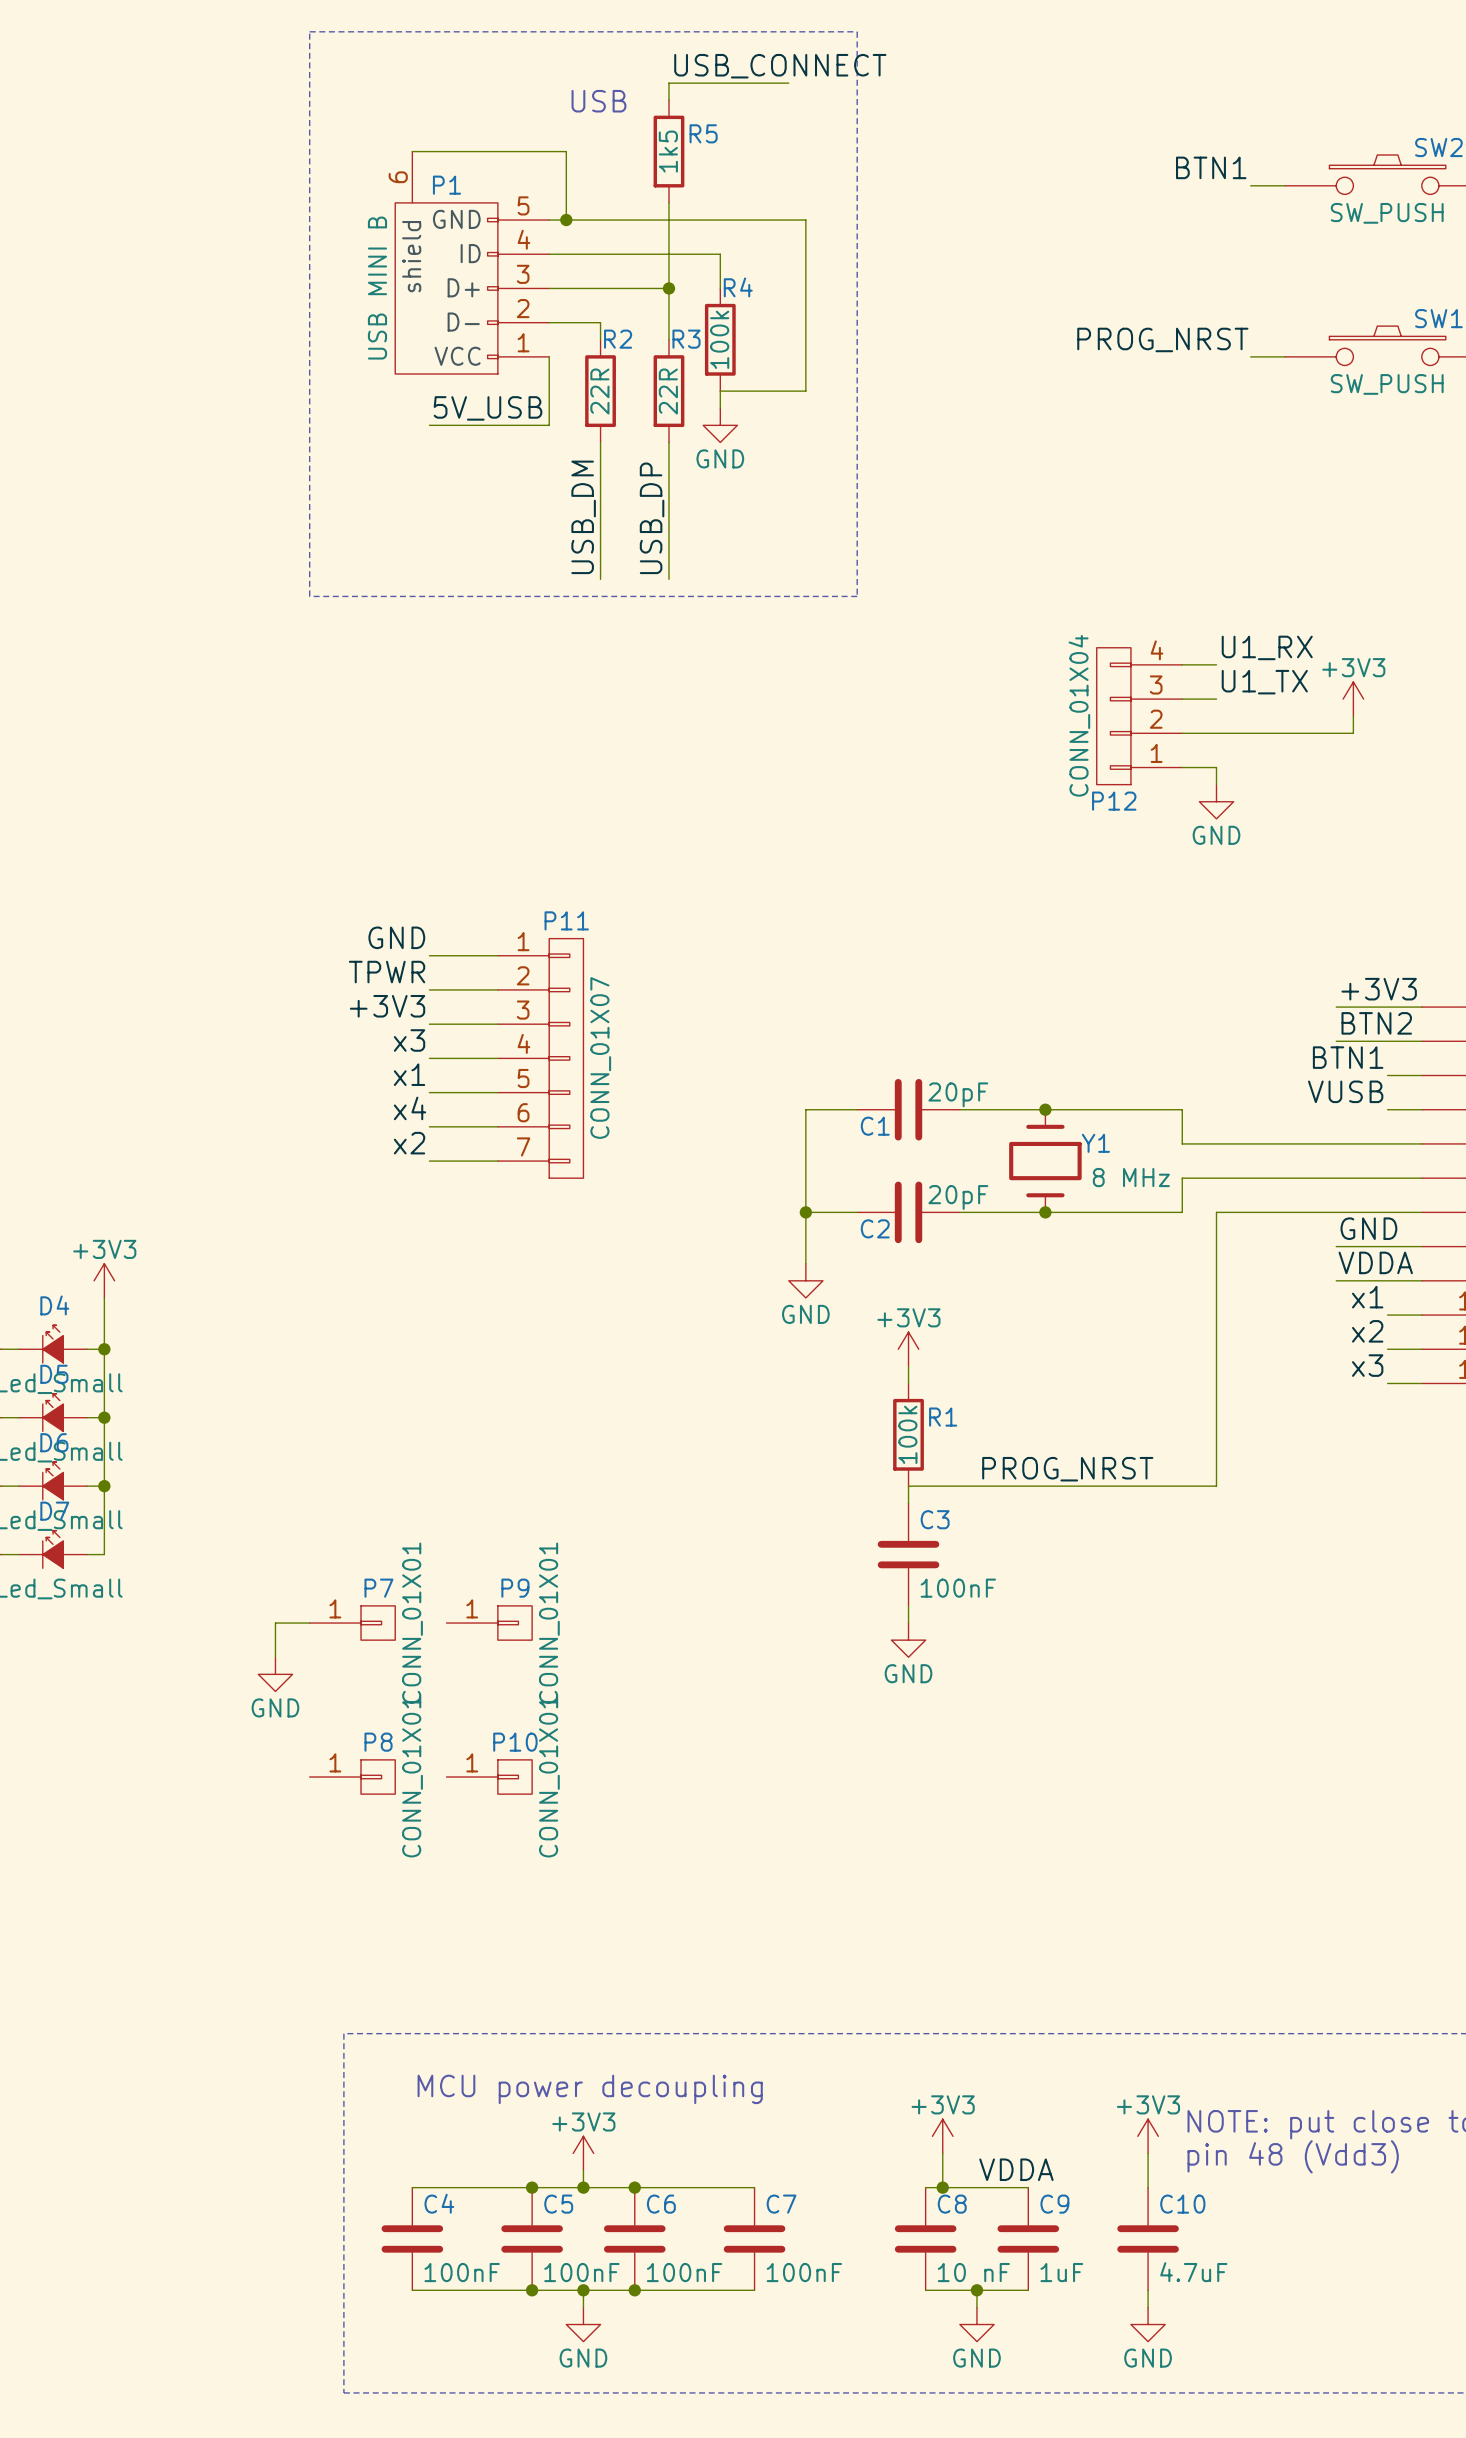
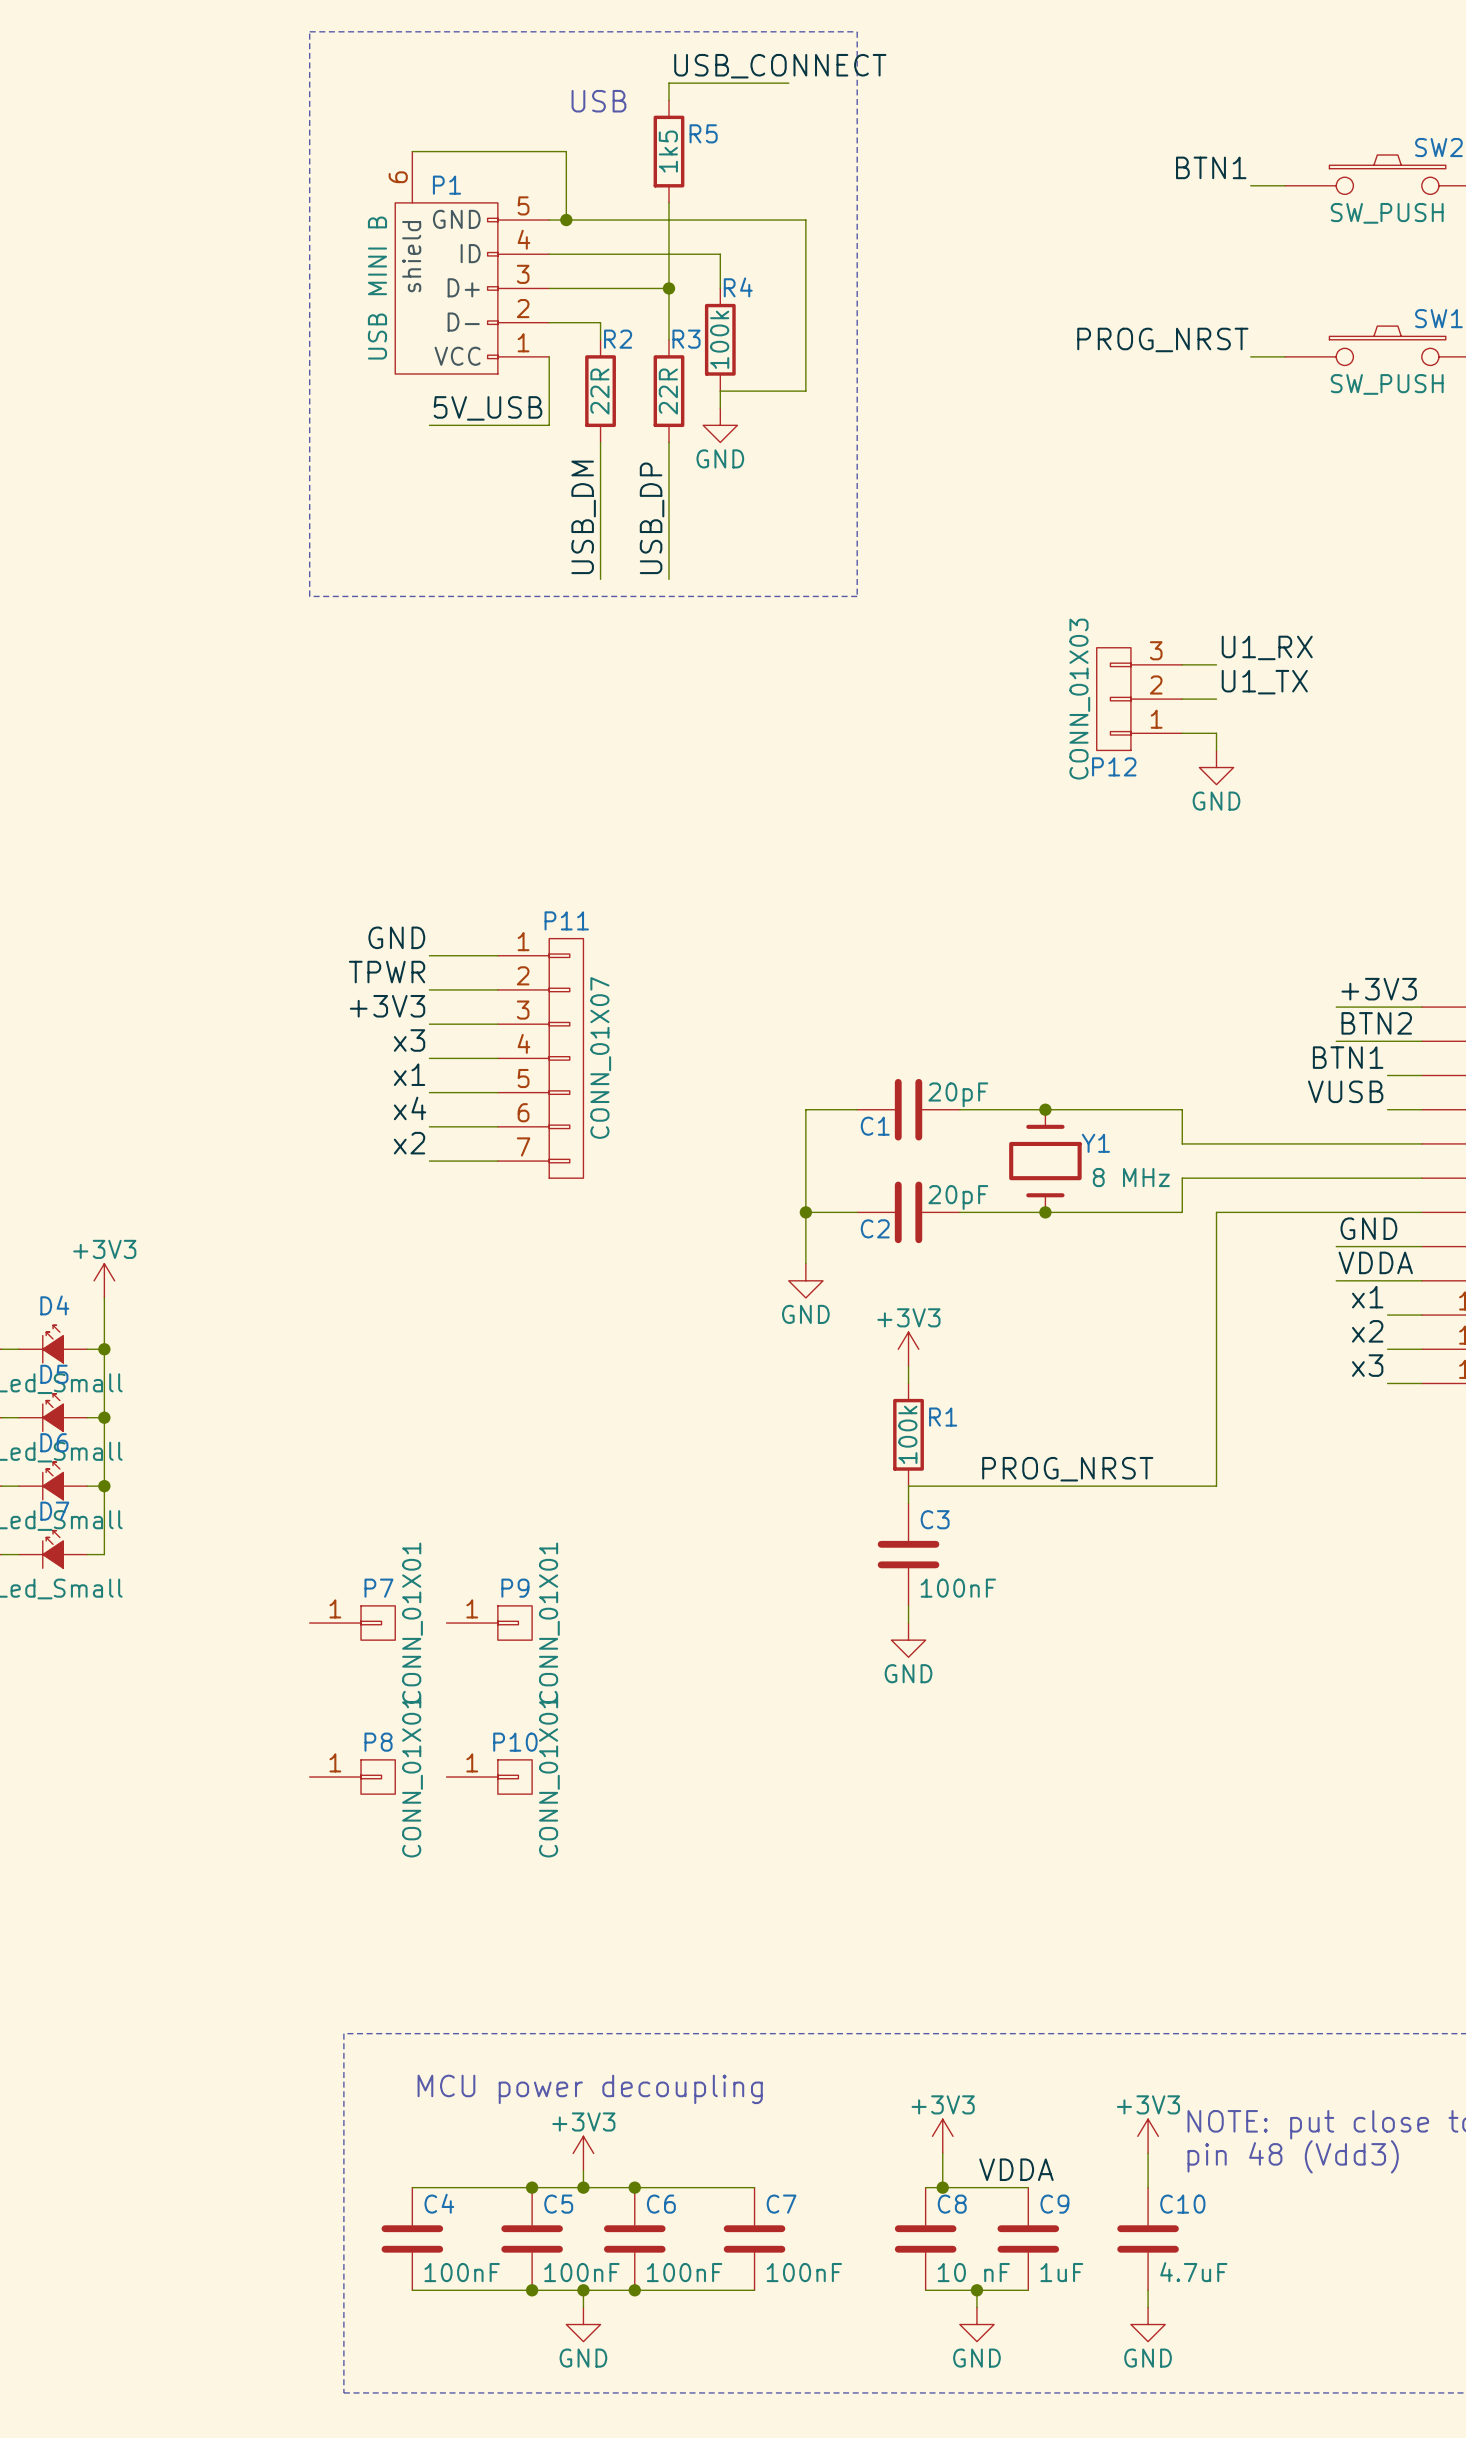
P12 symbol: [1096, 647, 1183, 785] -> [1096, 647, 1183, 751]
power symbol: +3V3 (1353, 699) -> none
P12 value: CONN_01X04 (1079, 715) -> CONN_01X03 (1079, 699)
wire: (1353, 716) (1353, 733) (1216, 733) -> (1216, 750) (1216, 733)
wire: (1182, 767) (1216, 767) (1216, 784) -> none
power symbol position: GND (1216, 801) -> GND (1216, 767)
wire: (309, 1623) (275, 1623) (275, 1657) -> none
power symbol: GND (275, 1674) -> none

